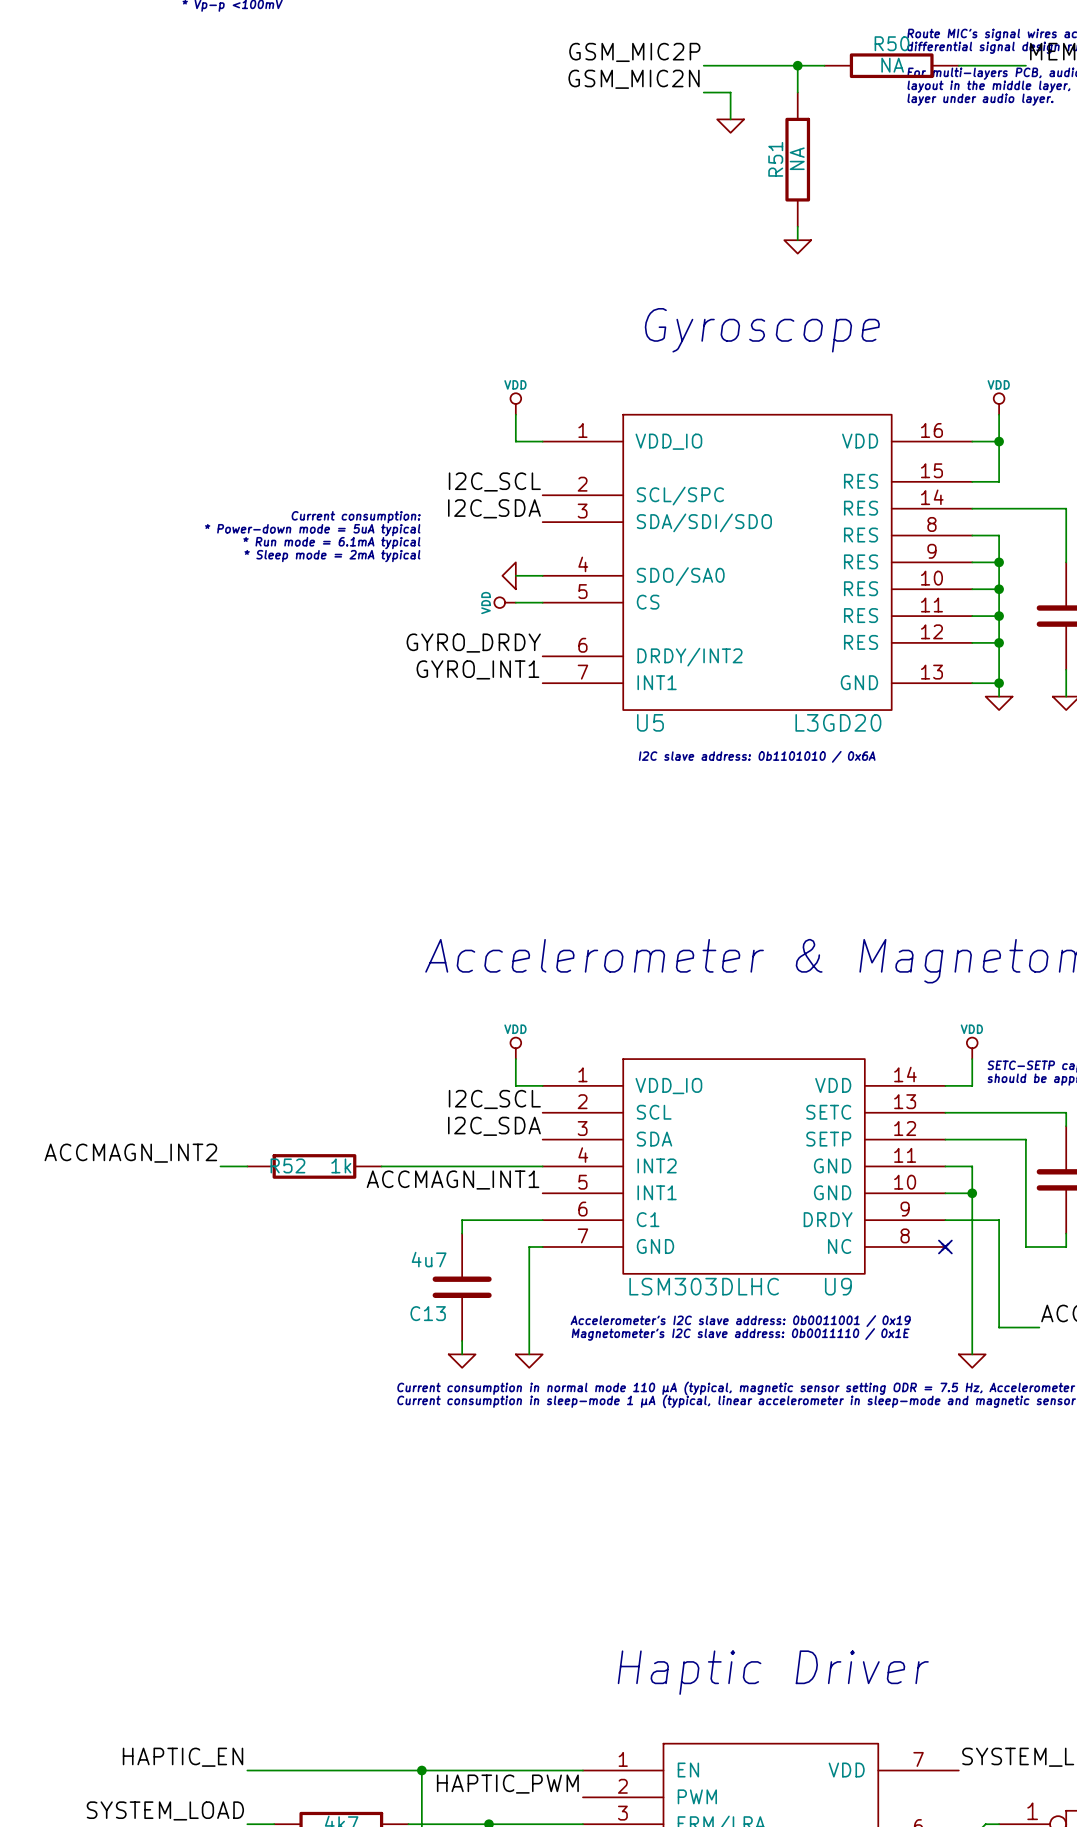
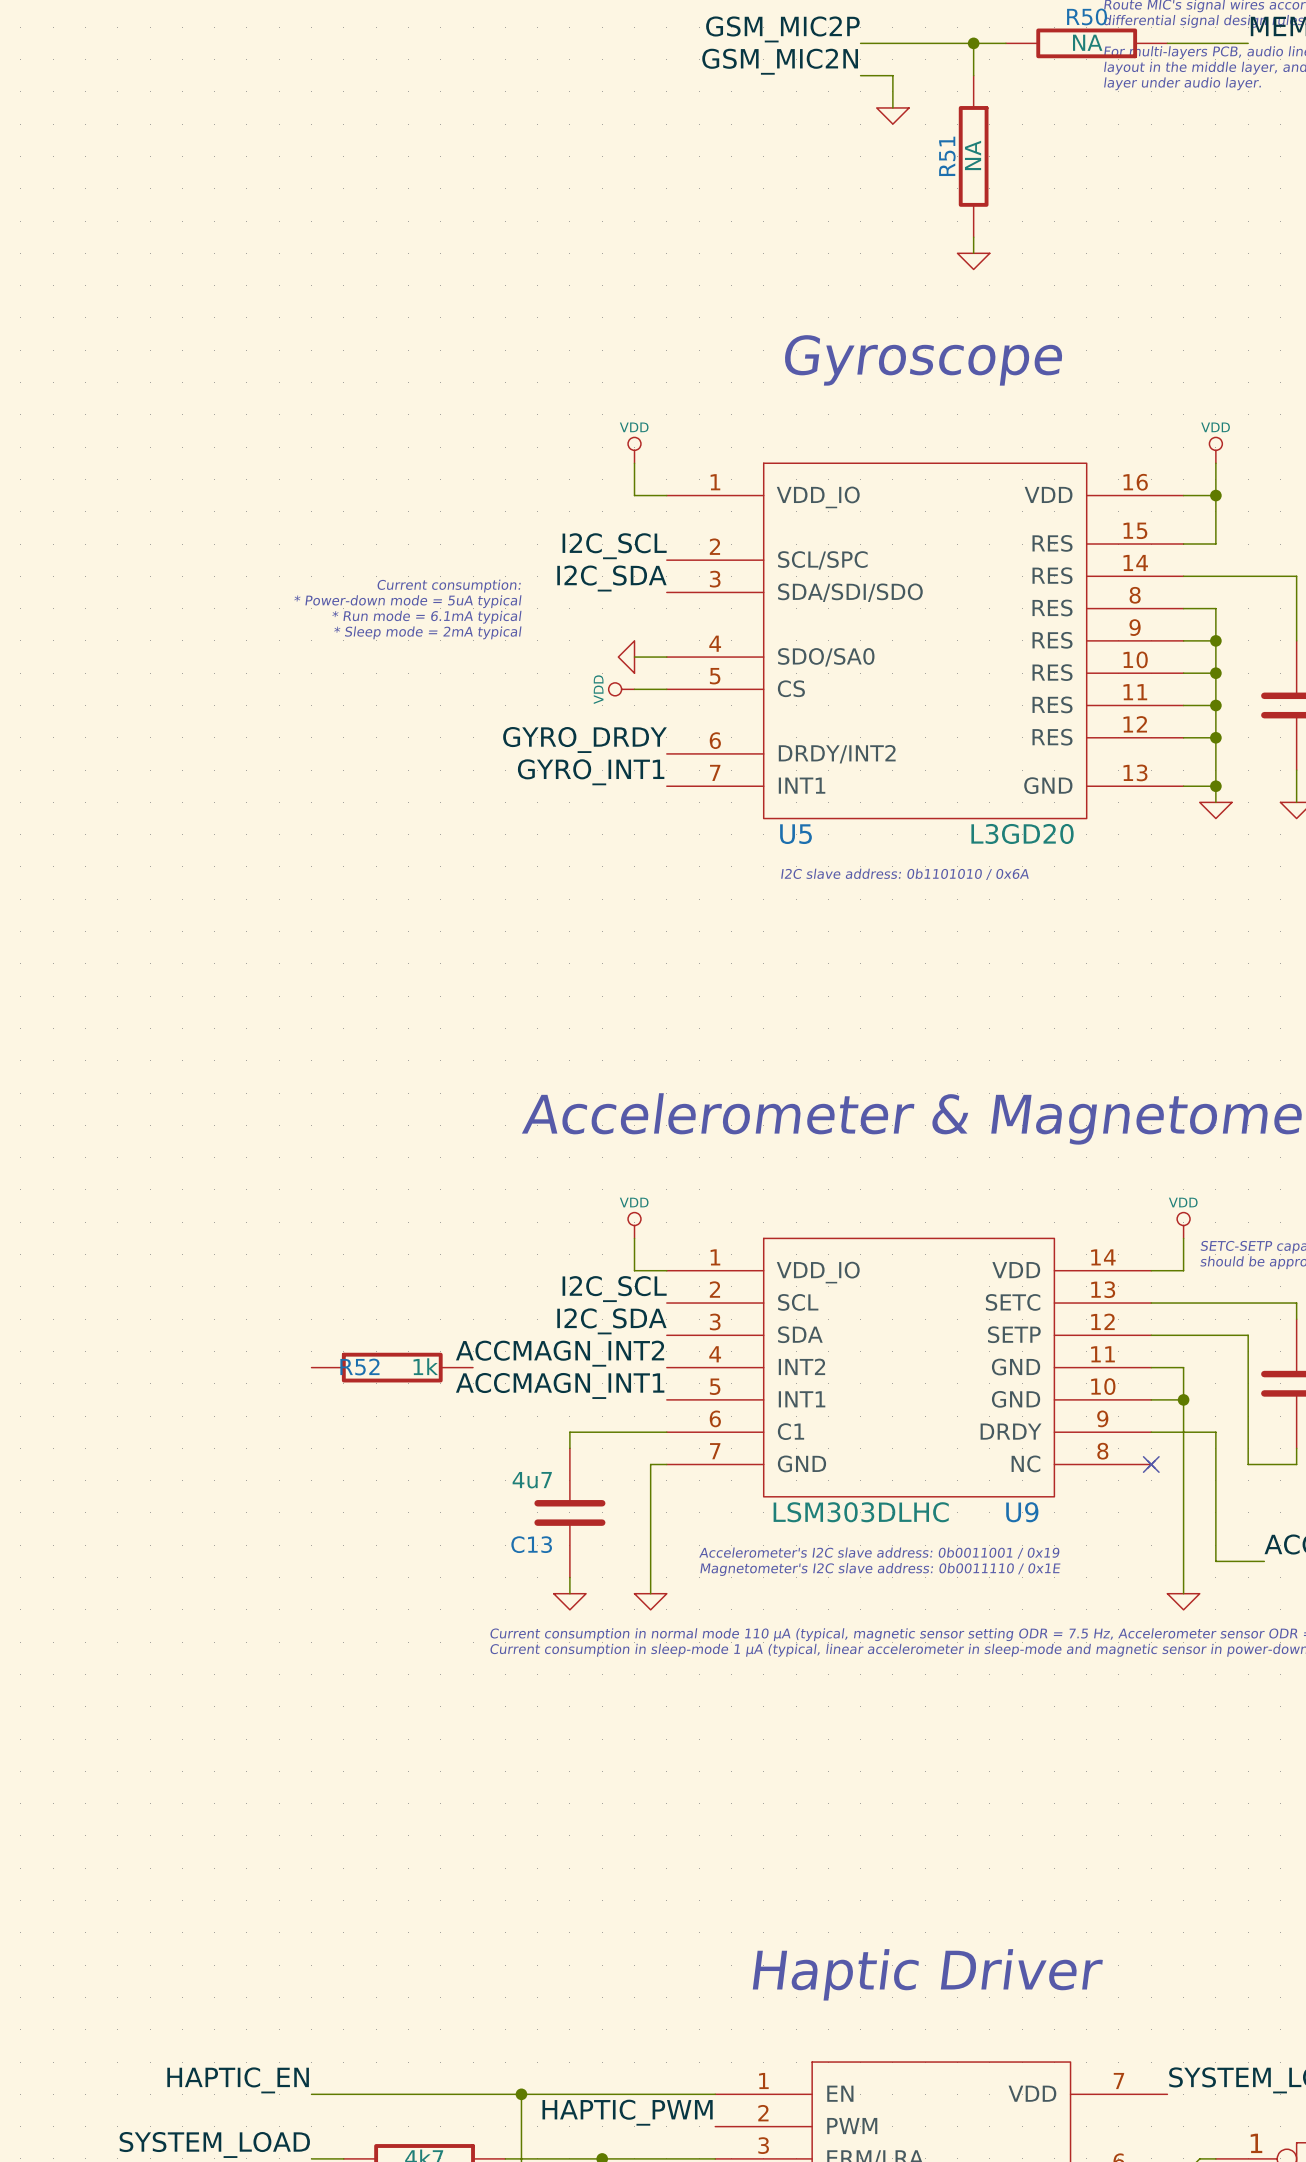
label: ACCMAGN_INT2 (130, 1153) -> none
label: none -> ACCMAGN_INT2 (560, 1353)
wire: (220, 1166) (247, 1166) -> none
wire: (381, 1166) (542, 1166) -> none

